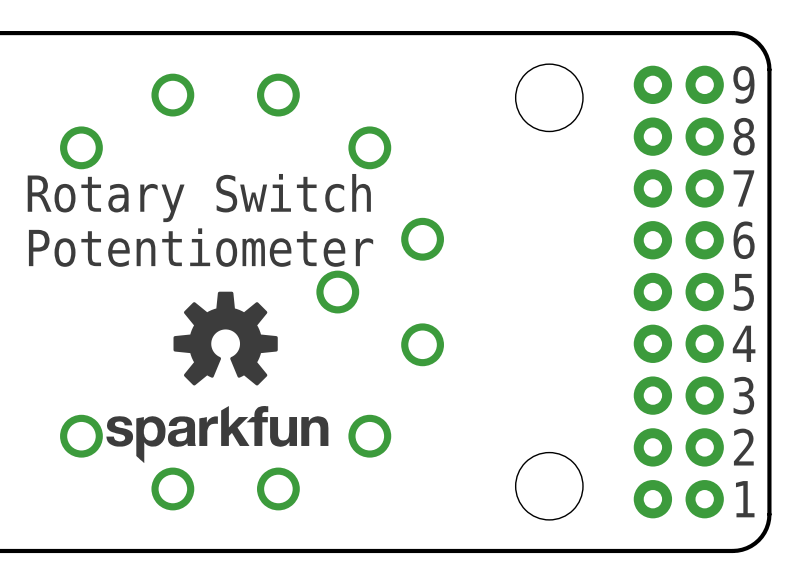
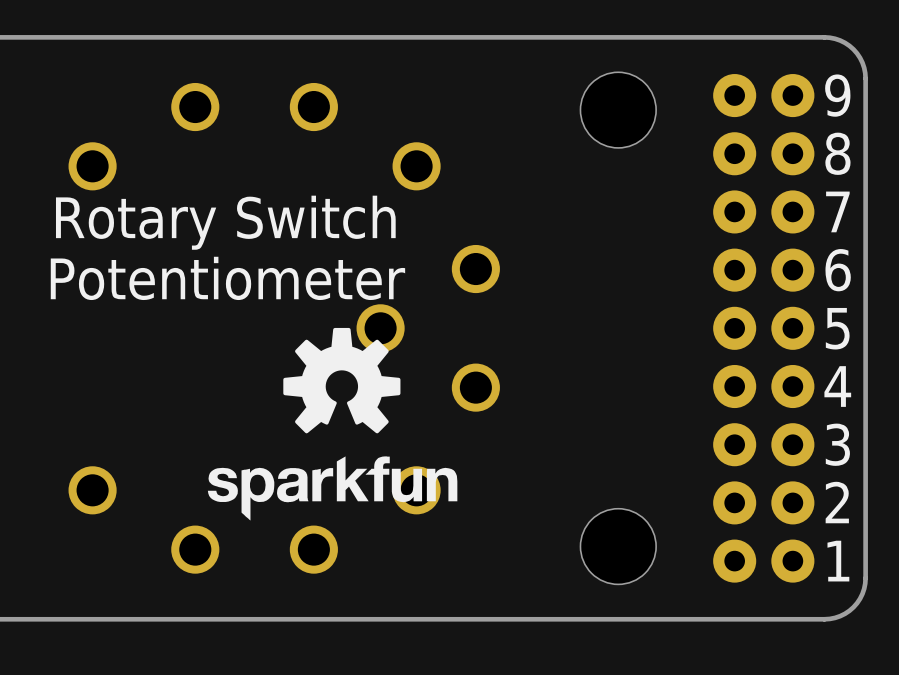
drawing position: (225, 338) -> (341, 380)
drawing position: (217, 434) -> (332, 488)

